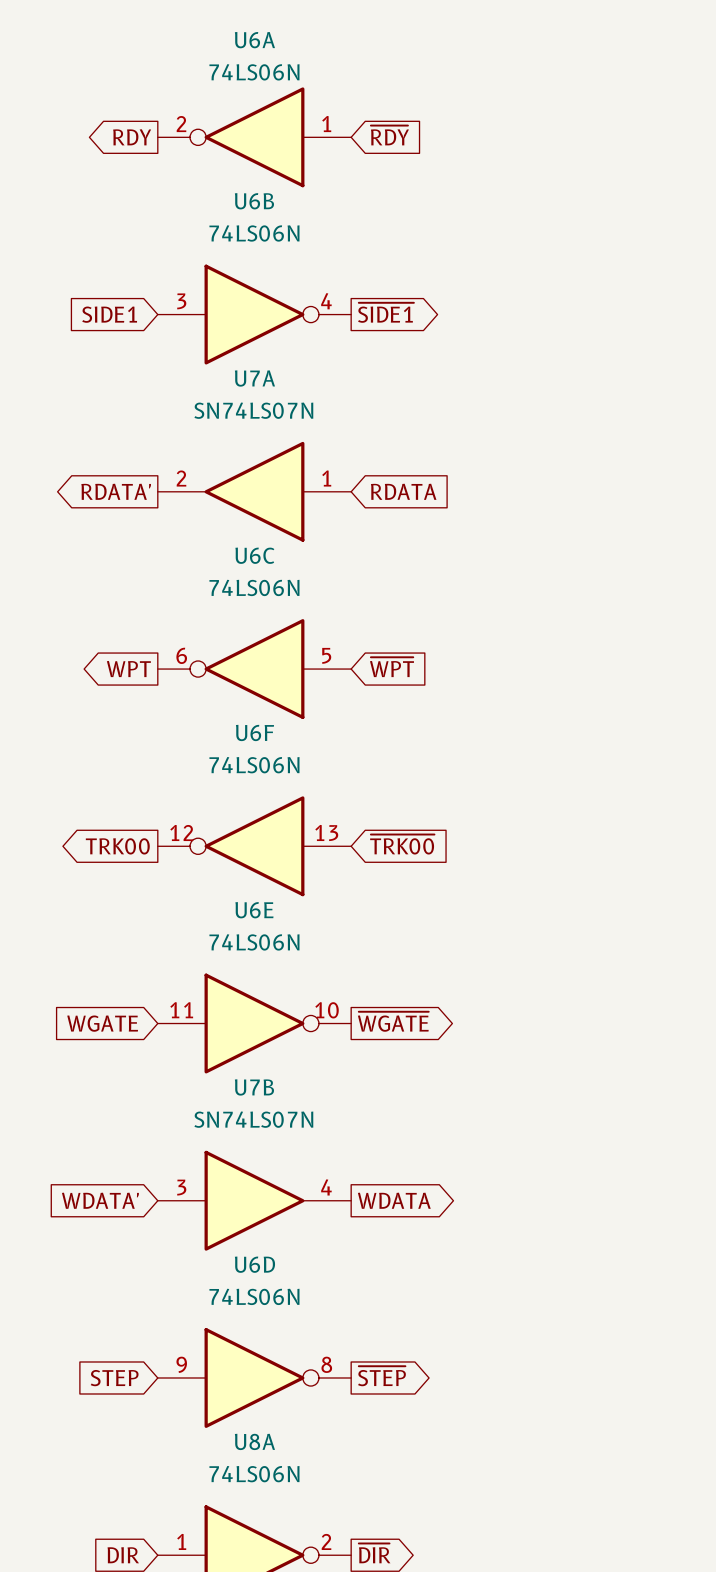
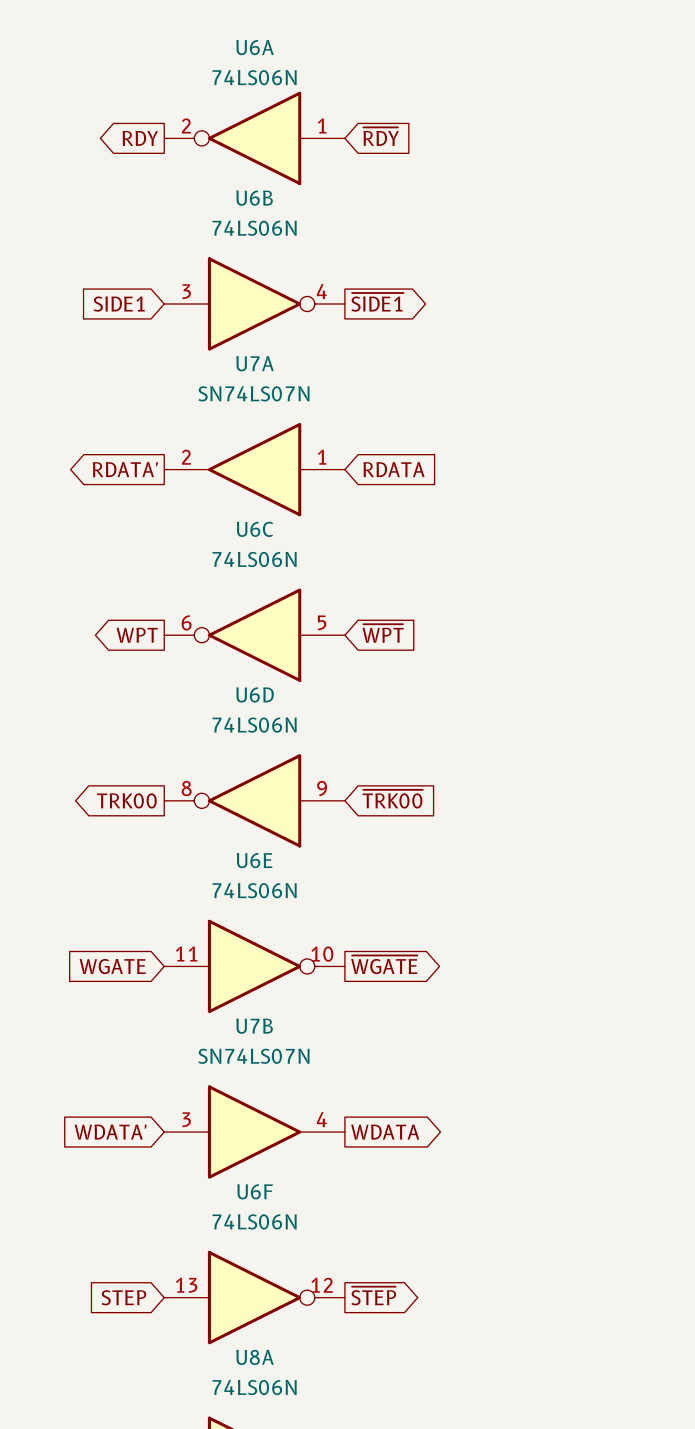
U6F rotation: 0° (254, 846) -> 180° (254, 1297)
U6F position: (254, 846) -> (254, 1297)
U6D rotation: 0° (254, 1377) -> 180° (254, 800)
U6D position: (254, 1377) -> (254, 800)

